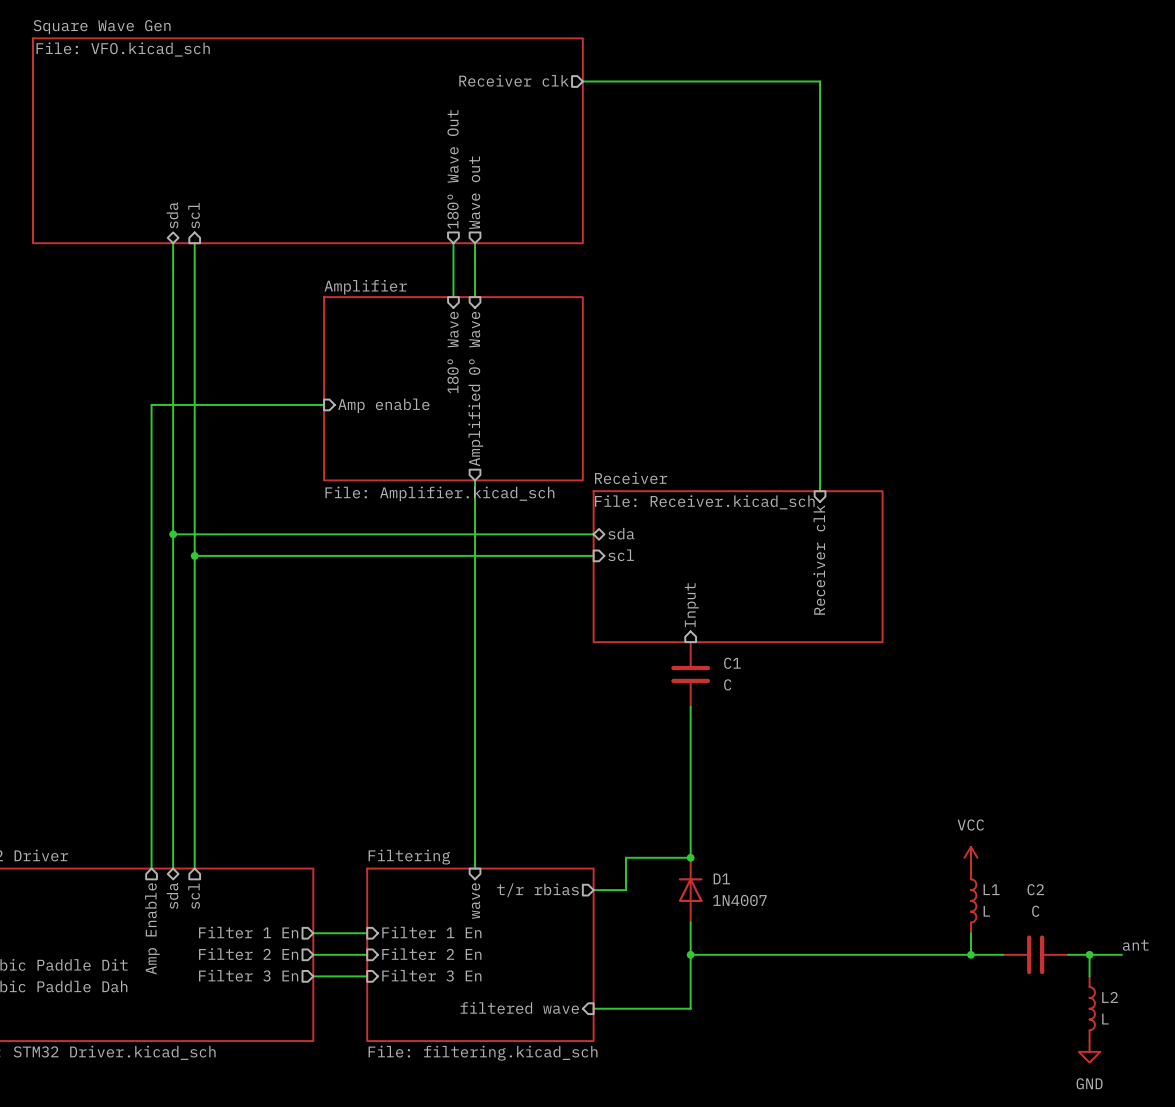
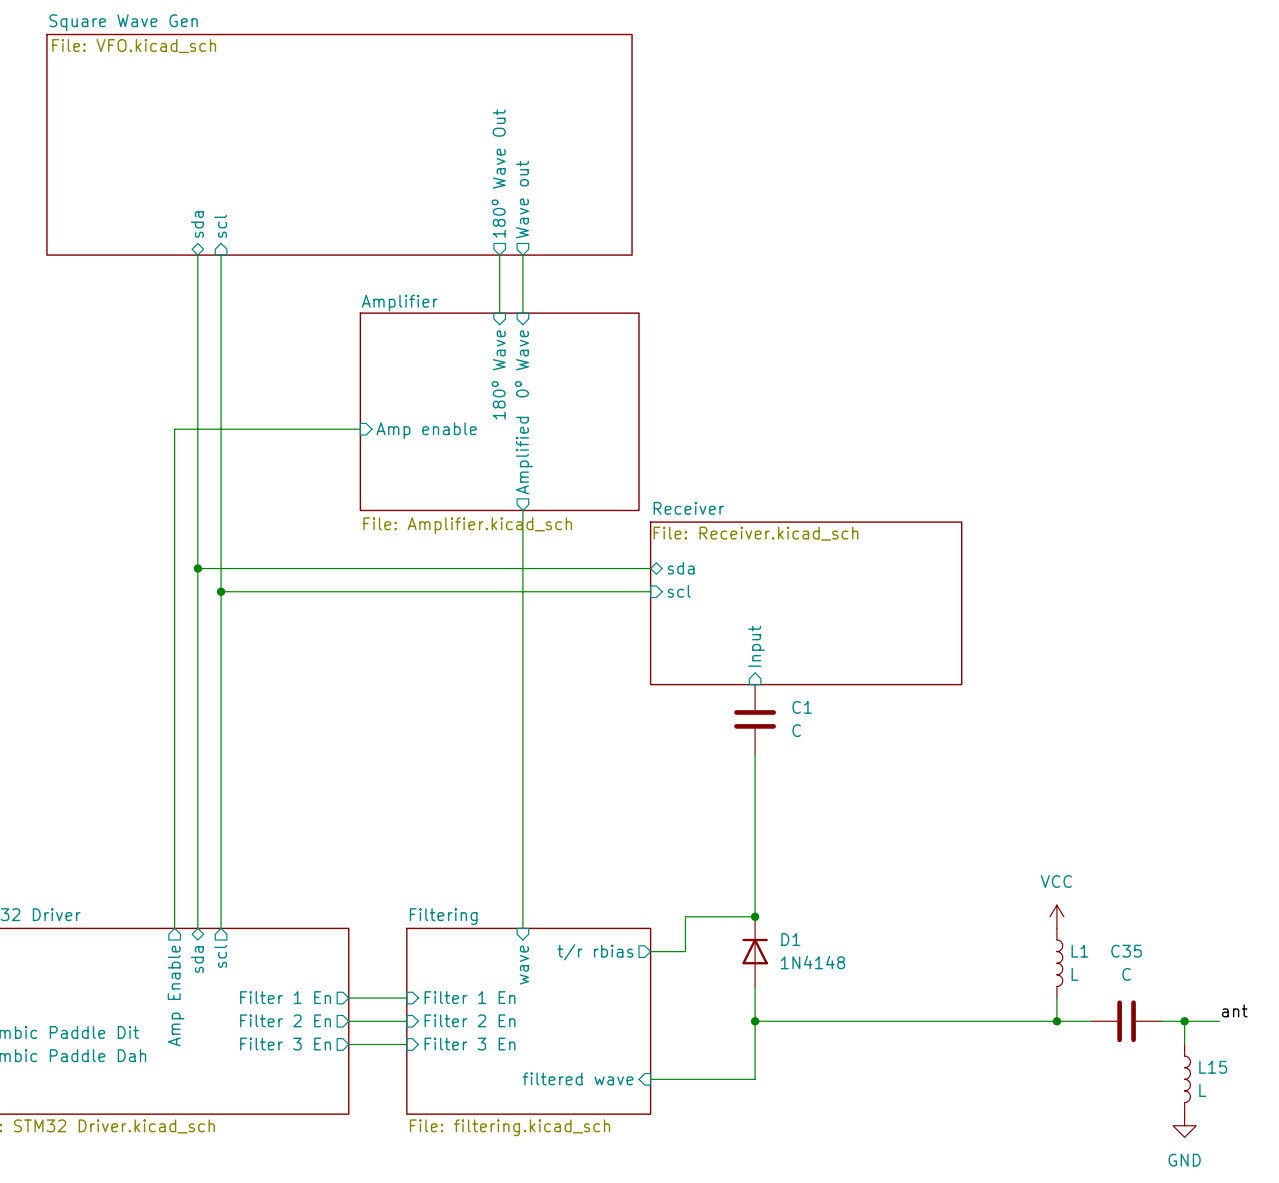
sheet Square Wave Gen shape: [32, 37, 584, 244] -> [46, 33, 633, 256]
sheet pin: Receiver clk (514, 80) -> none
wire: (582, 81) (820, 81) (820, 491) -> none
sheet pin: Receiver clk (819, 560) -> none
C2 name: C2 (1035, 889) -> C35 (1126, 951)
D1 value: 1N4007 (739, 900) -> 1N4148 (812, 962)
L2 name: L2 (1110, 997) -> L15 (1213, 1067)

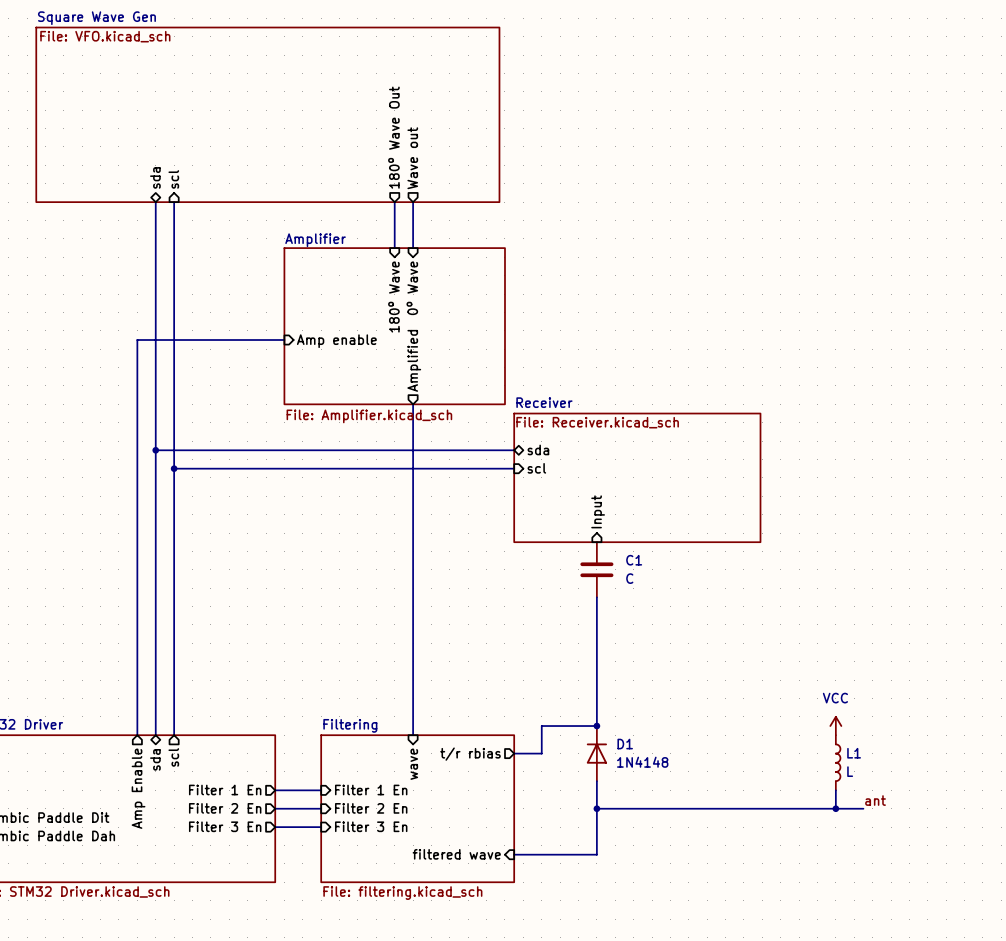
label position: ant (1234, 1010) -> ant (875, 800)
C35: C (1126, 1021) -> none
wire: (1161, 1021) (1219, 1021) -> none
wire: (1184, 1021) (1184, 1044) -> none
junction: (1184, 1021) -> none
L15: L (1187, 1079) -> none
power symbol: GND (1184, 1125) -> none

